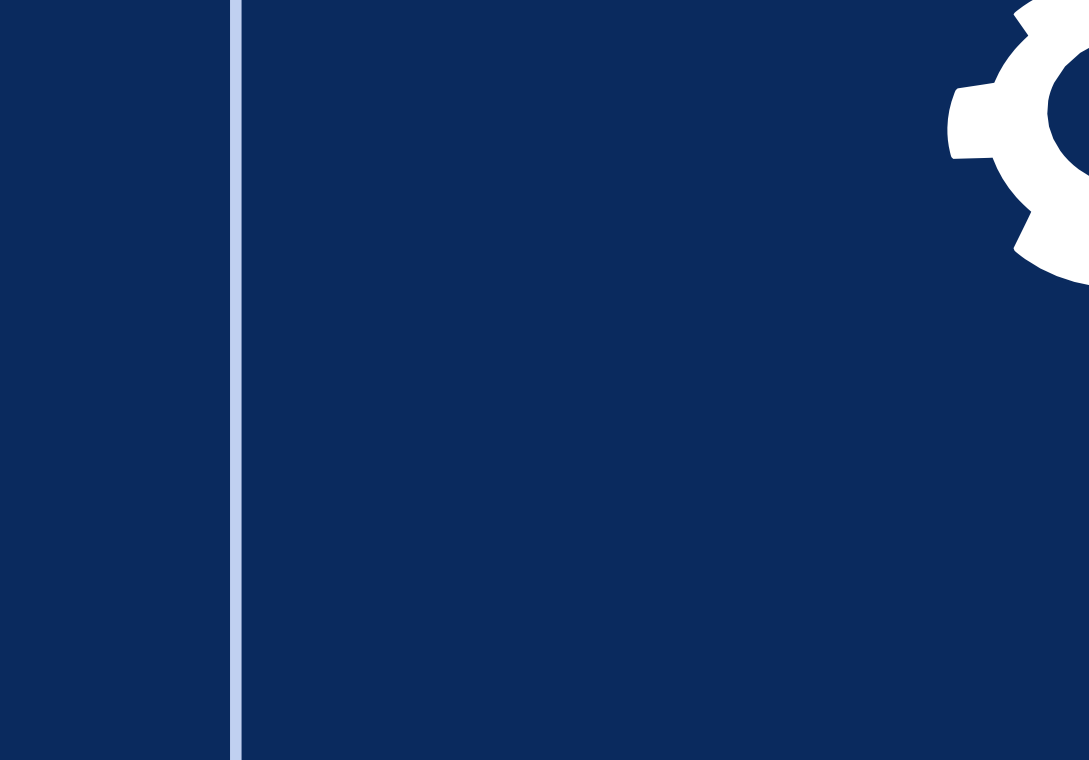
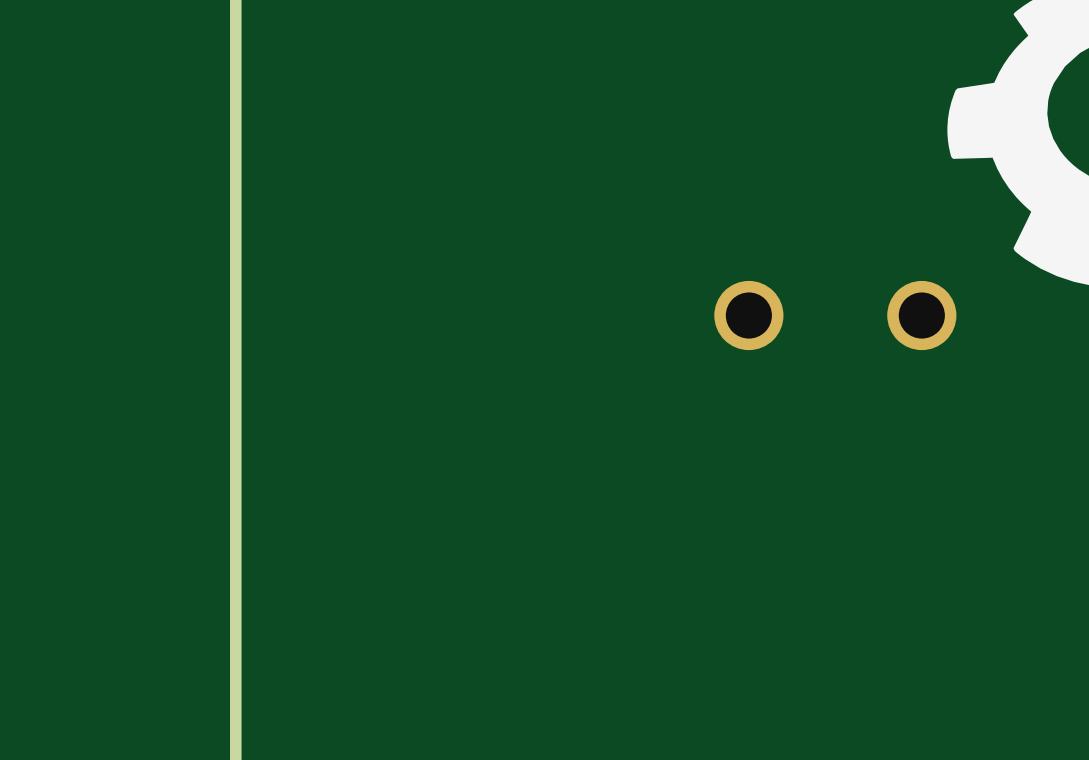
part: none -> (748, 315)
part: none -> (921, 315)

